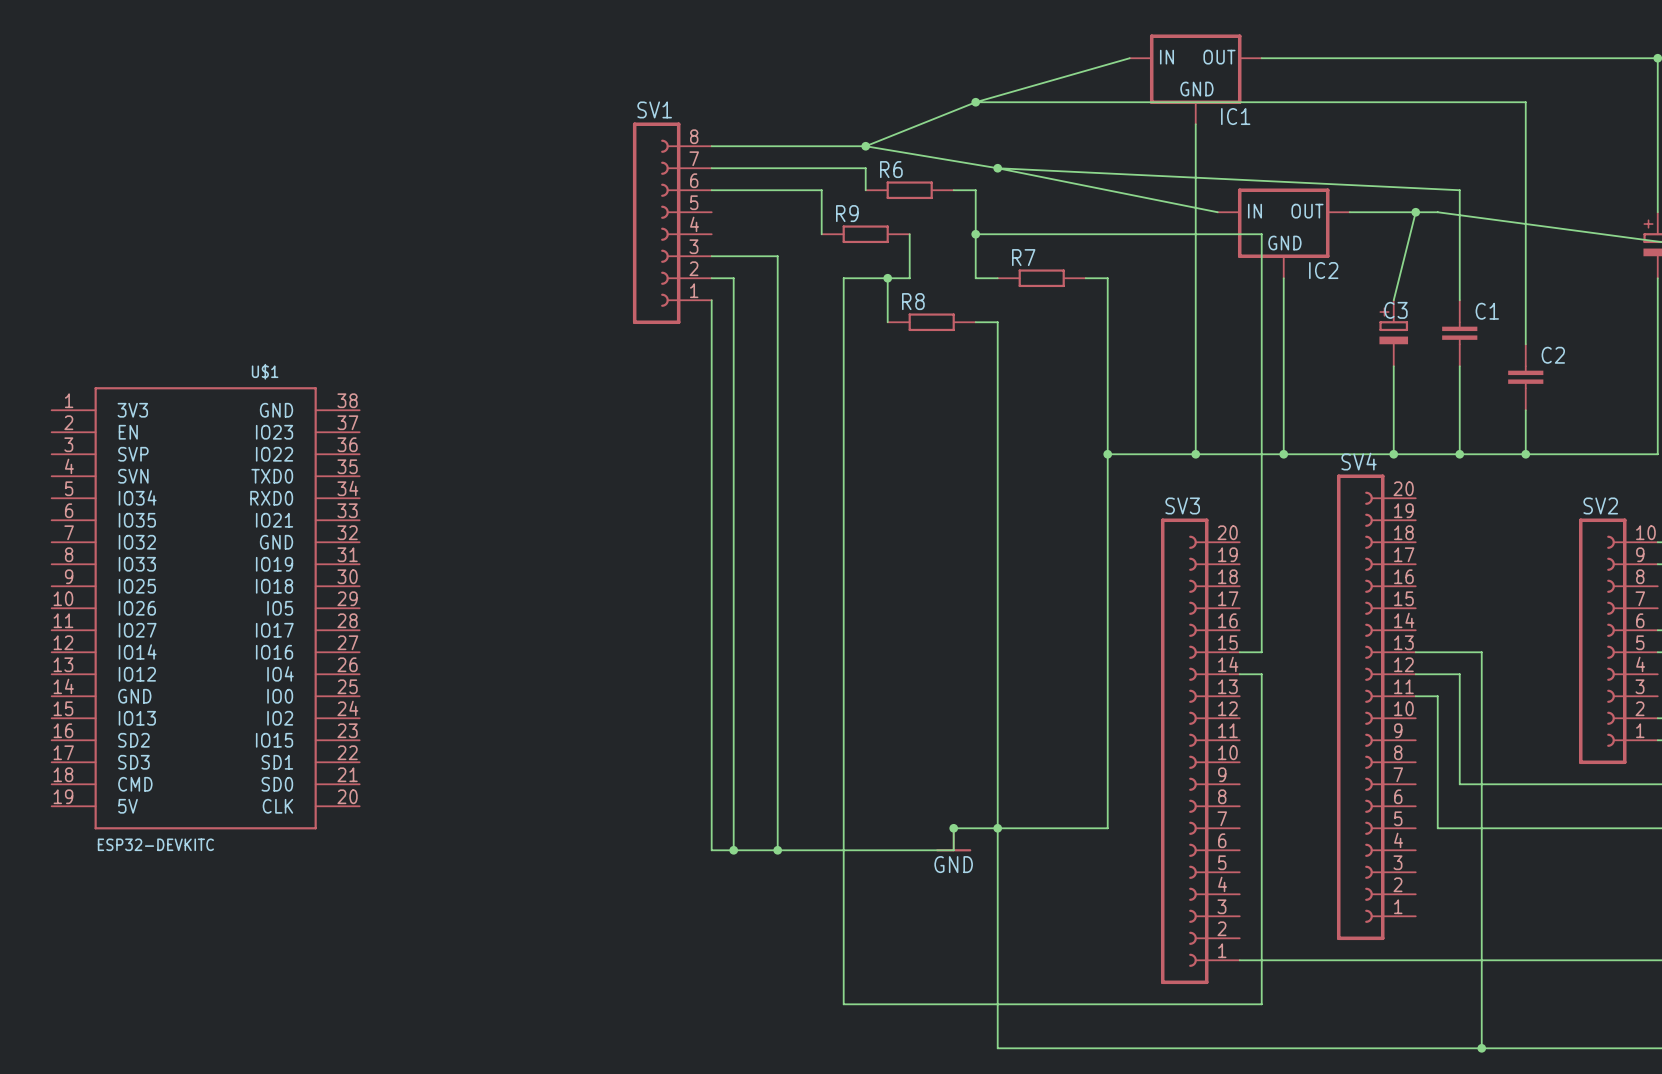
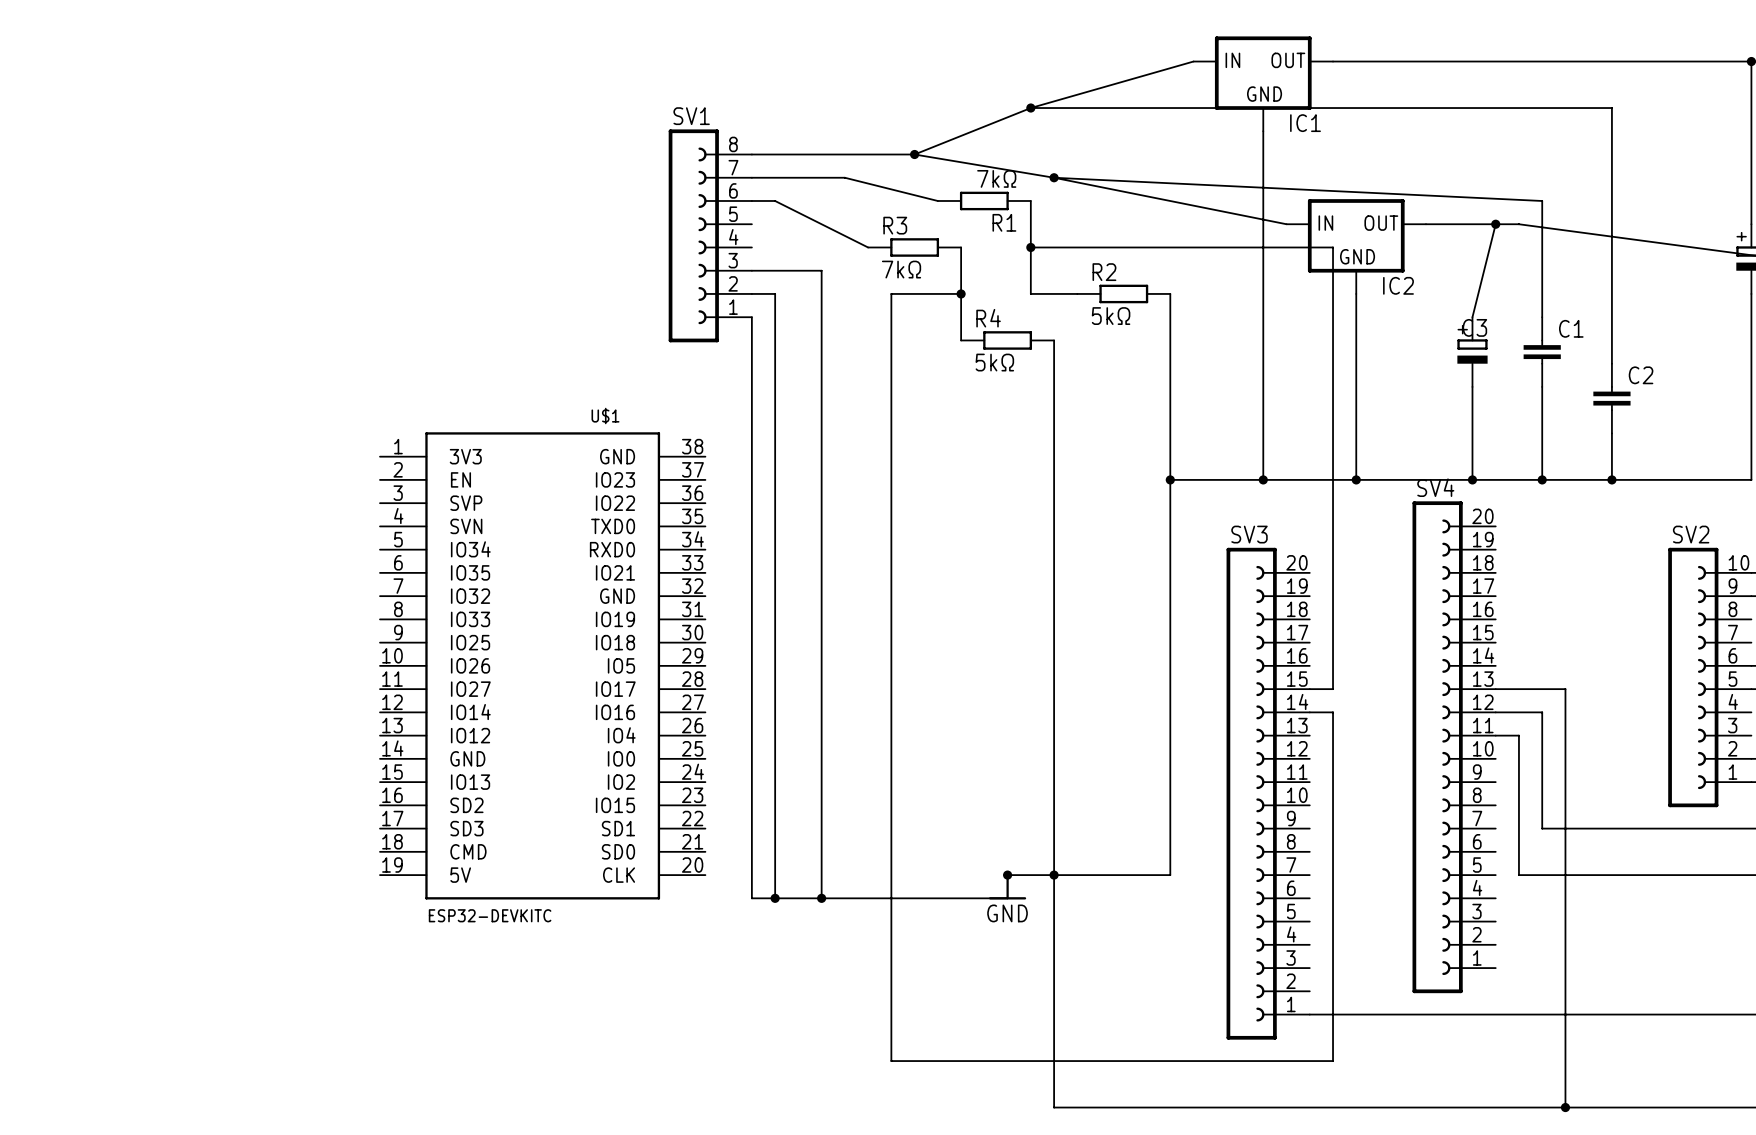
wire: (799, 168) (865, 168) (865, 190) -> (844, 177) (937, 200)
wire: (733, 190) (821, 190) (821, 234) -> (775, 200) (868, 247)
R6: (909, 190) -> none
R1: none -> 7kΩ (984, 200)
R9 name: R9 (847, 213) -> R3 (895, 225)
R9 value: none -> 7kΩ (901, 269)
wire: (887, 278) (887, 322) -> (961, 293) (961, 340)
junction position: (887, 278) -> (961, 293)
R7: (1041, 278) -> none
R2: none -> 5kΩ (1123, 293)
R8: (931, 322) -> none
R4: none -> 5kΩ (1007, 340)
U$1 position: (205, 608) -> (542, 665)

